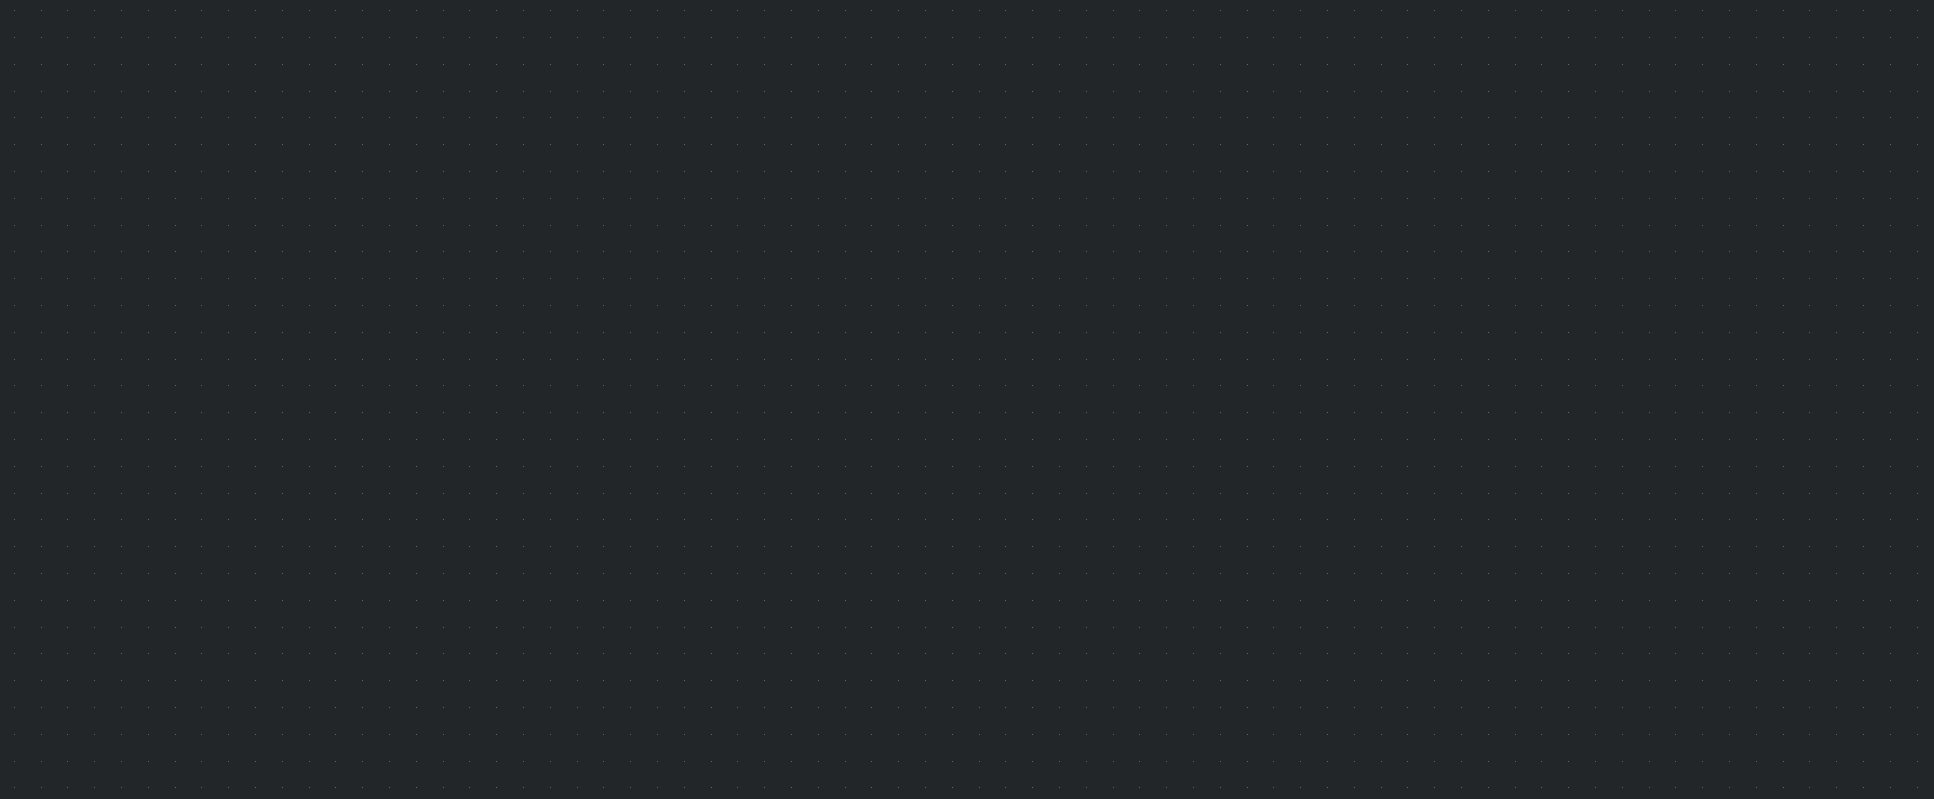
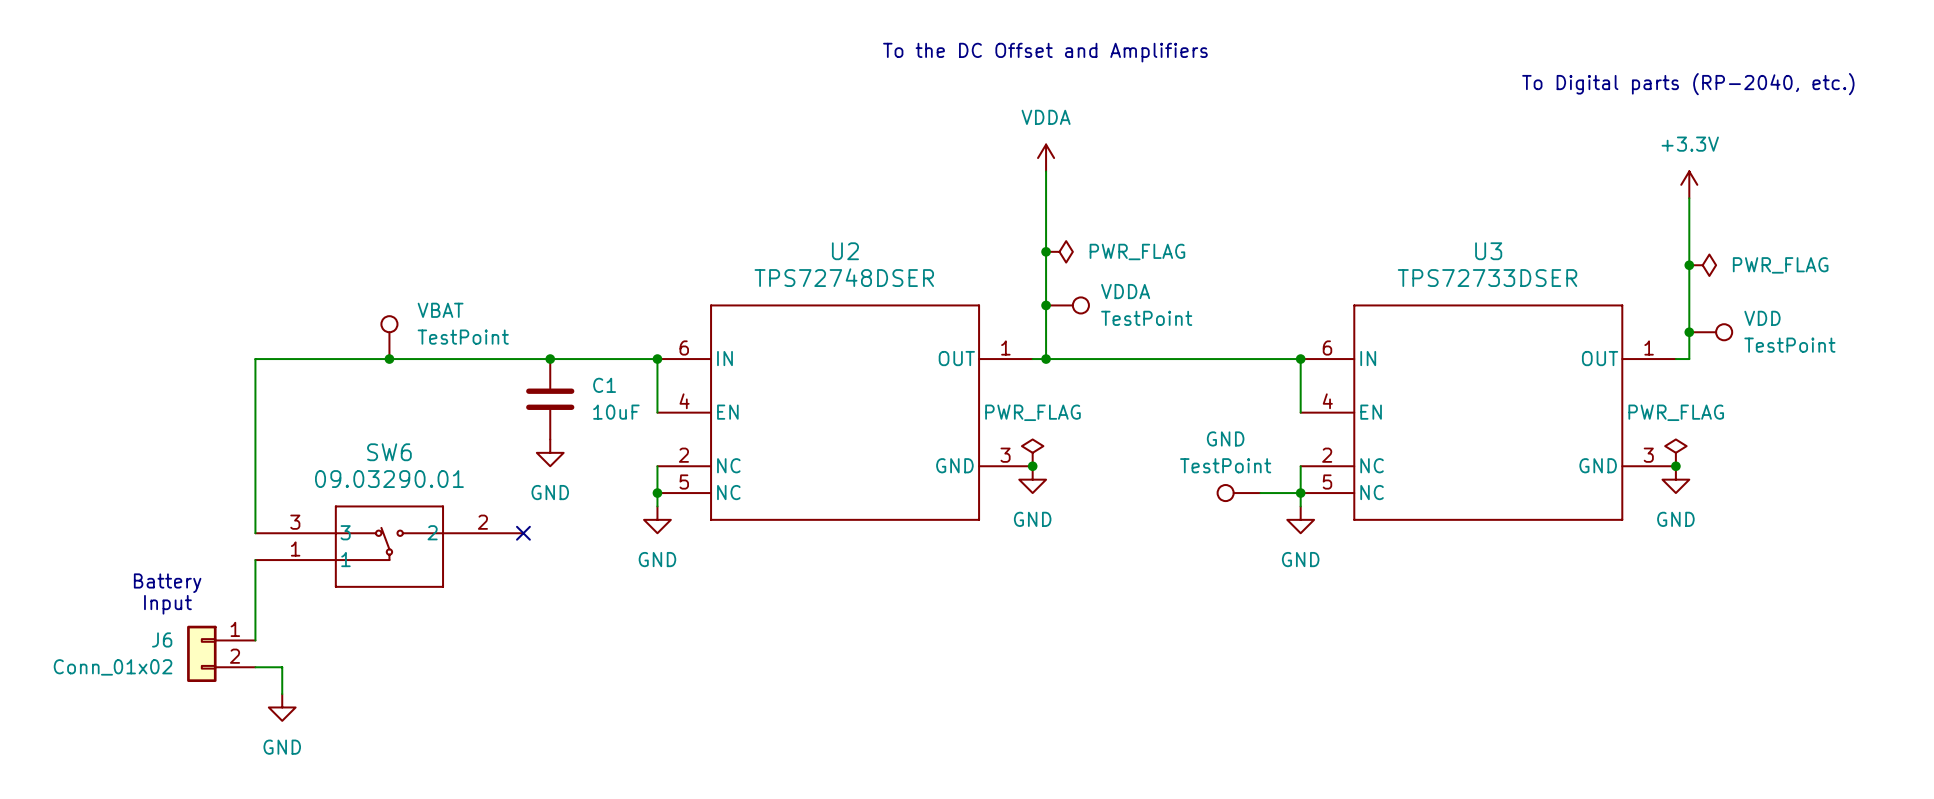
text: none -> To the DC Offset and Amplifiers (1045, 52)
text: none -> To Digital parts (RP-2040, etc.) (1688, 84)
power symbol: none -> VDDA (1046, 158)
wire: none -> (1046, 171) (1046, 359)
power symbol: none -> +3.3V (1689, 184)
wire: none -> (1689, 198) (1689, 359) (1675, 359)
junction: none -> (1046, 251)
power symbol: none -> PWR_FLAG (1059, 251)
junction: none -> (1689, 265)
power symbol: none -> PWR_FLAG (1702, 265)
junction: none -> (1046, 305)
VDDA: none -> TestPoint (1067, 305)
junction: none -> (1689, 332)
VDD: none -> TestPoint (1710, 332)
VBAT: none -> TestPoint (389, 337)
junction: none -> (389, 359)
junction: none -> (550, 359)
junction: none -> (657, 359)
wire: none -> (1032, 359) (1300, 359) (1300, 412)
junction: none -> (1046, 359)
junction: none -> (1300, 359)
C1: none -> 10uF (550, 399)
wire: none -> (657, 412) (657, 359) (255, 359) (255, 533)
U2: none -> TPS72748DSER (845, 412)
U3: none -> TPS72733DSER (1488, 412)
power symbol: none -> GND (550, 452)
power symbol: none -> PWR_FLAG (1032, 452)
power symbol: none -> PWR_FLAG (1675, 452)
wire: none -> (657, 466) (657, 506)
junction: none -> (1032, 466)
wire: none -> (1300, 466) (1300, 506)
junction: none -> (1675, 466)
power symbol: none -> GND (1032, 479)
power symbol: none -> GND (1675, 479)
junction: none -> (657, 493)
GND: none -> TestPoint (1239, 493)
wire: none -> (1260, 493) (1300, 493)
junction: none -> (1300, 493)
power symbol: none -> GND (657, 519)
power symbol: none -> GND (1300, 519)
no-connect mark: none -> (523, 533)
SW6: none -> 09.03290.01 (389, 546)
wire: none -> (255, 560) (255, 640)
text: none -> Battery (167, 583)
text: none -> Input (167, 604)
J6: none -> Conn_01x02 (221, 653)
wire: none -> (255, 667) (282, 667) (282, 694)
power symbol: none -> GND (282, 707)

